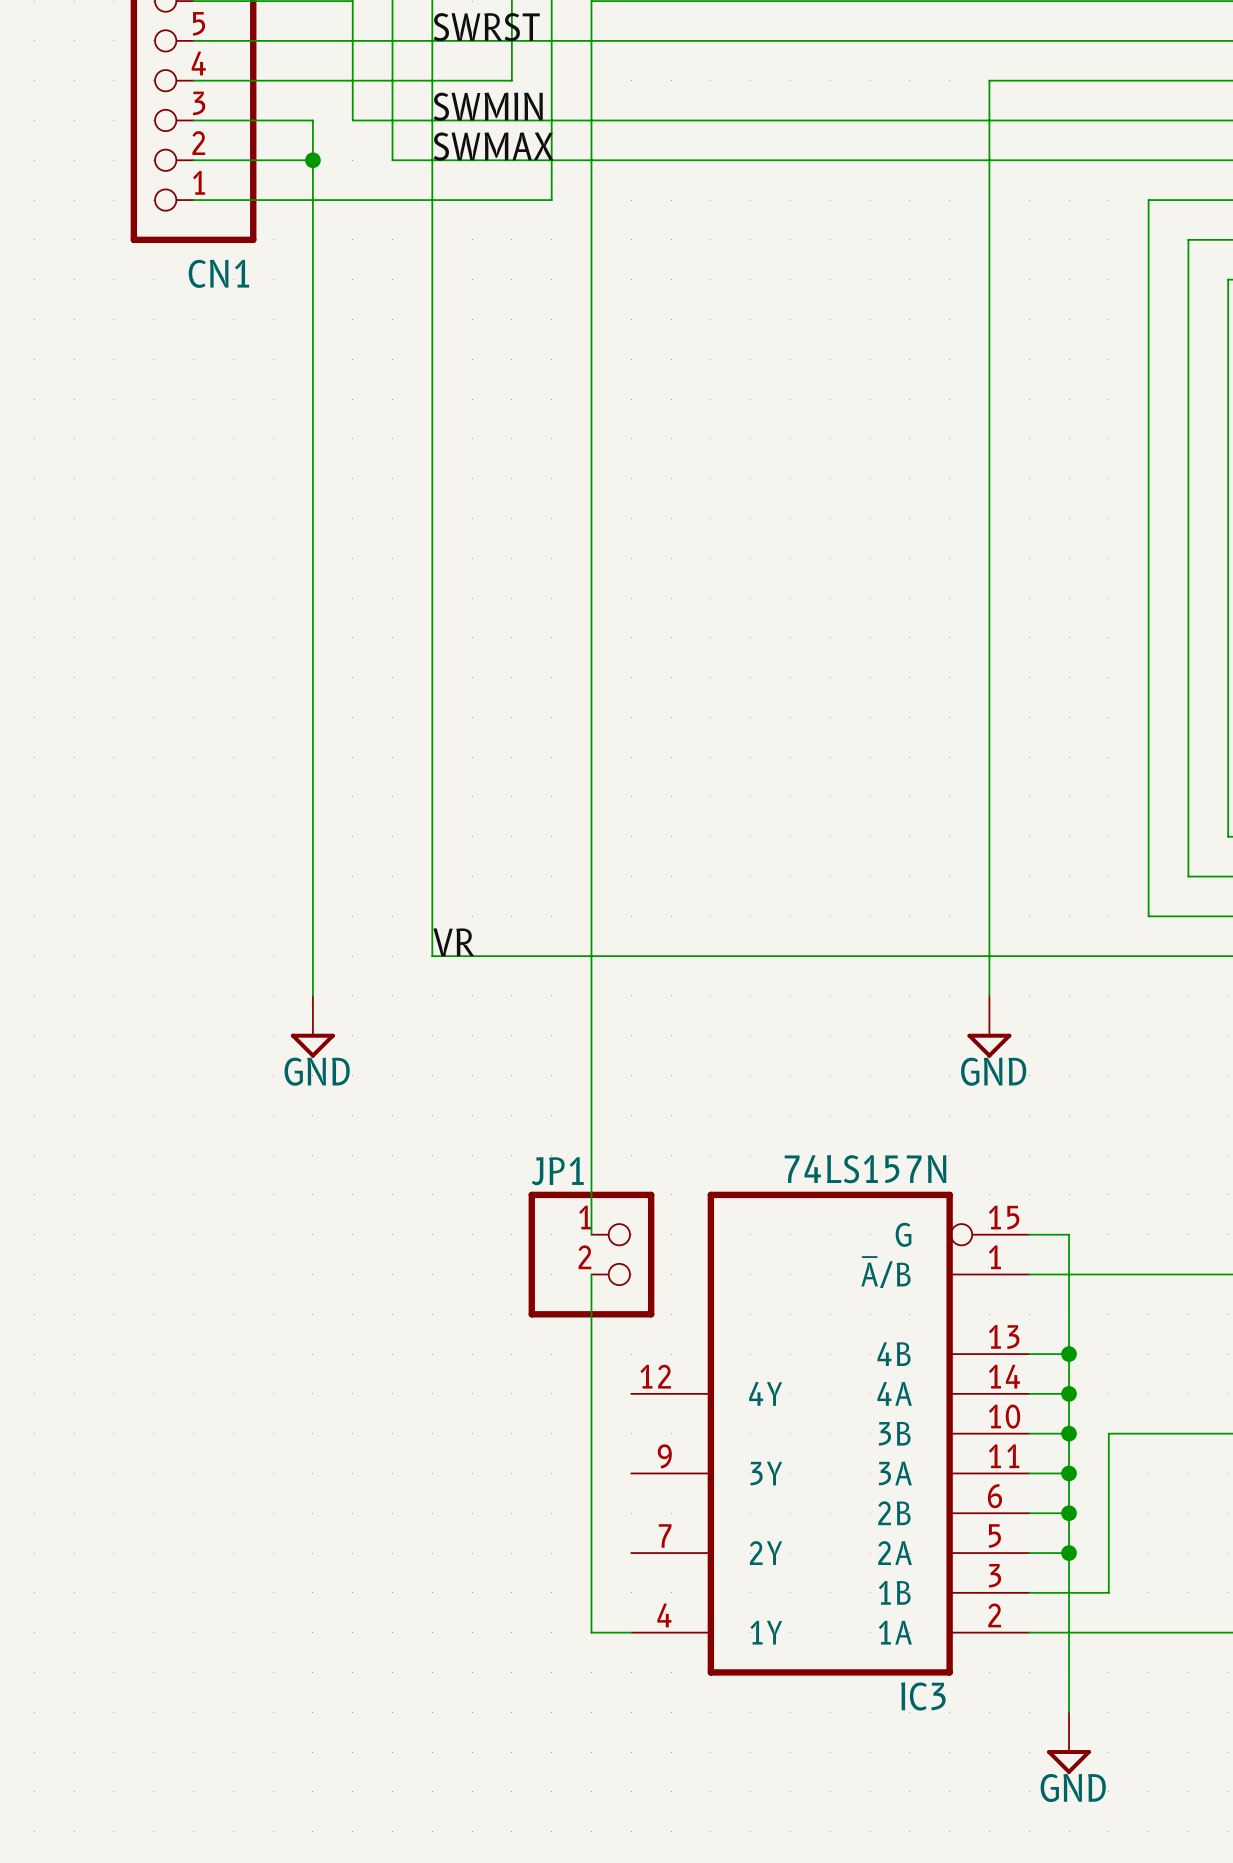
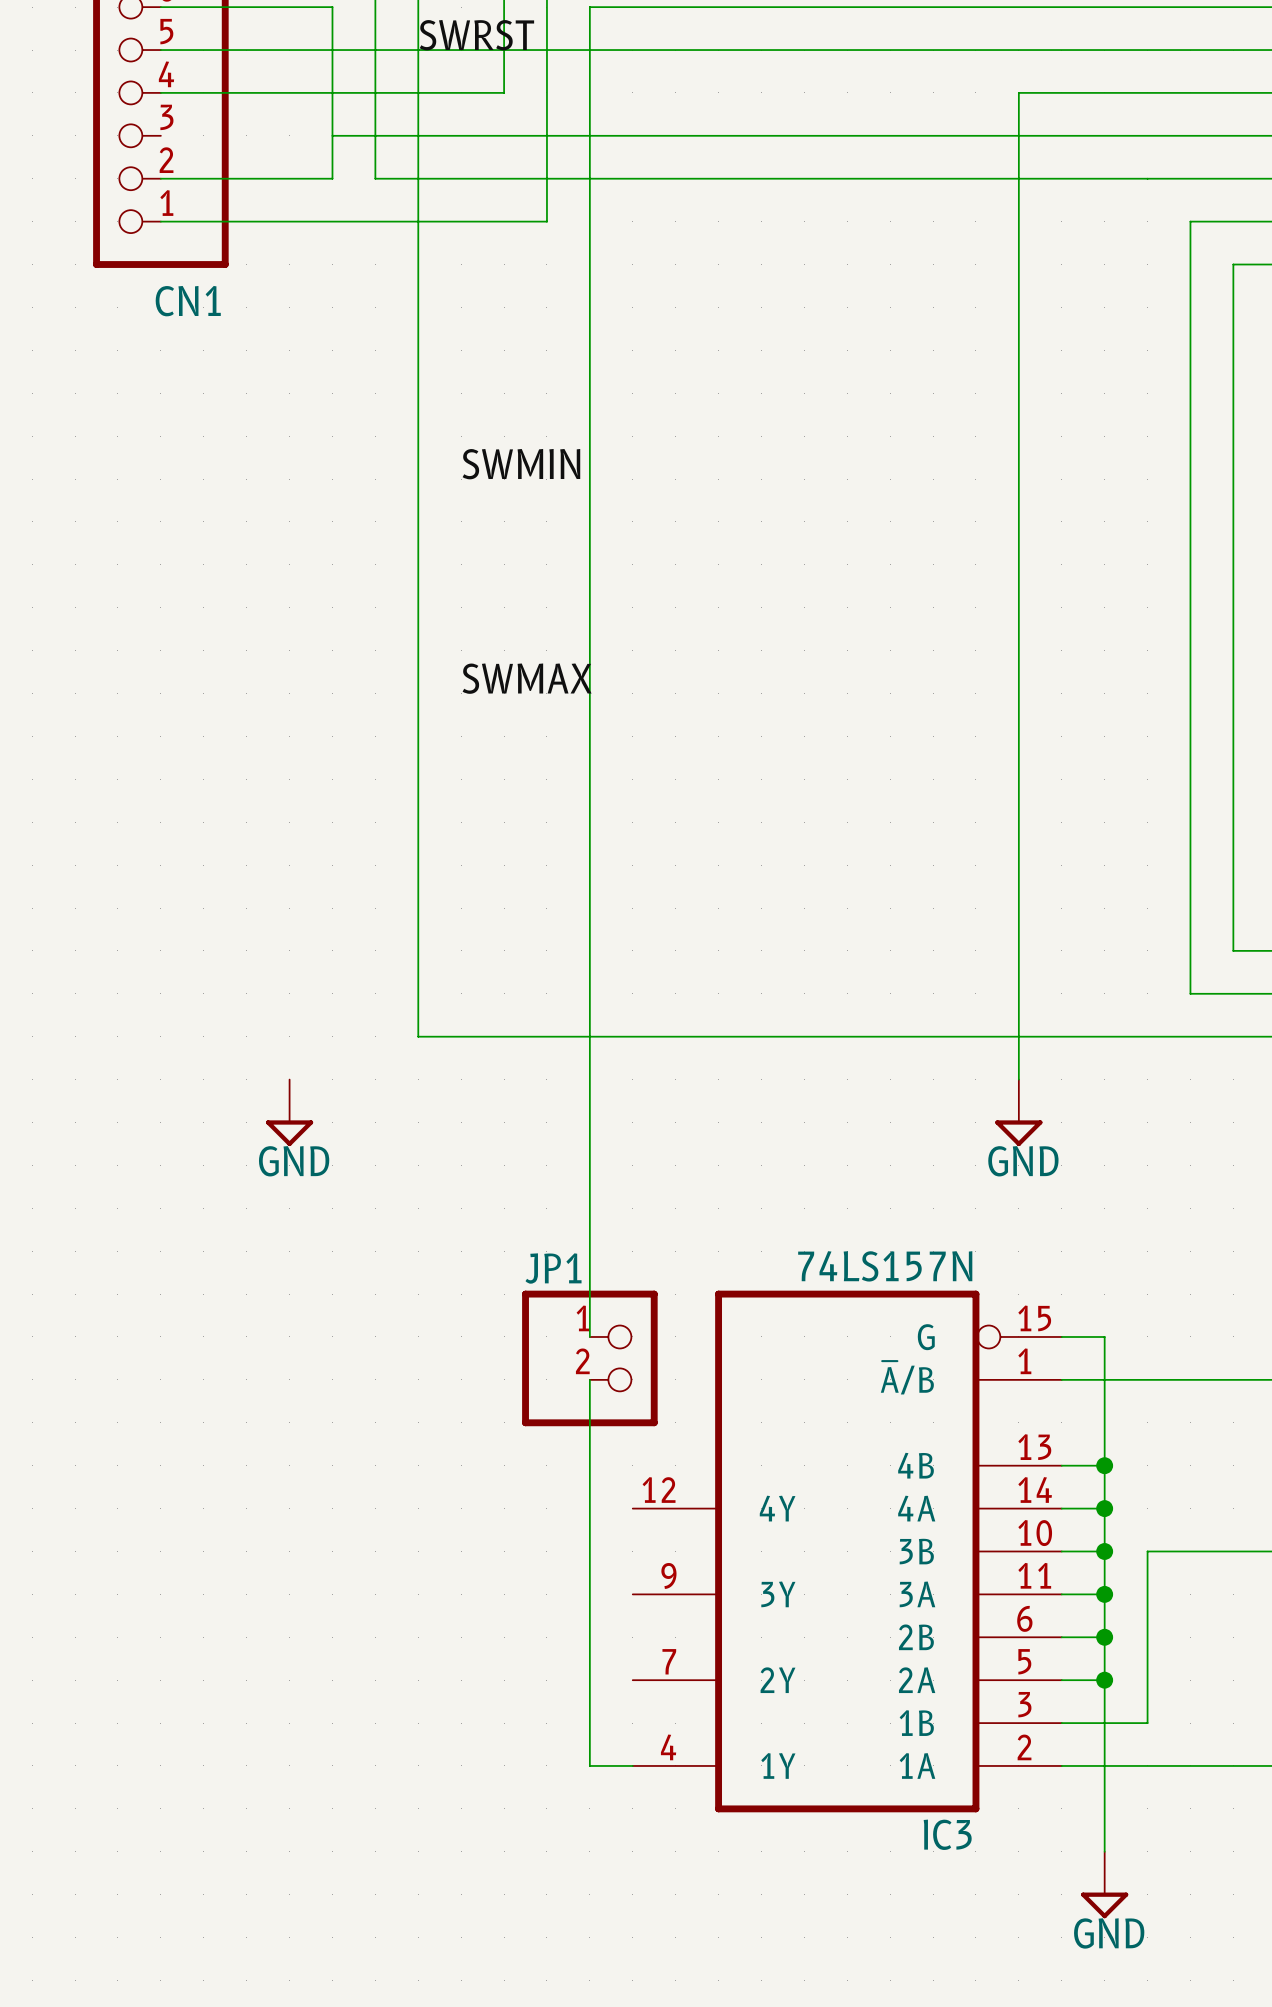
label position: SWMIN (488, 106) -> SWMIN (521, 464)
wire: (193, 120) (312, 120) (312, 995) -> none
wire: none -> (332, 135) (332, 178) (289, 178)
label: SWMAX (493, 146) -> none
junction: (312, 160) -> none
label: none -> SWMAX (527, 678)
label: VR (453, 942) -> none

